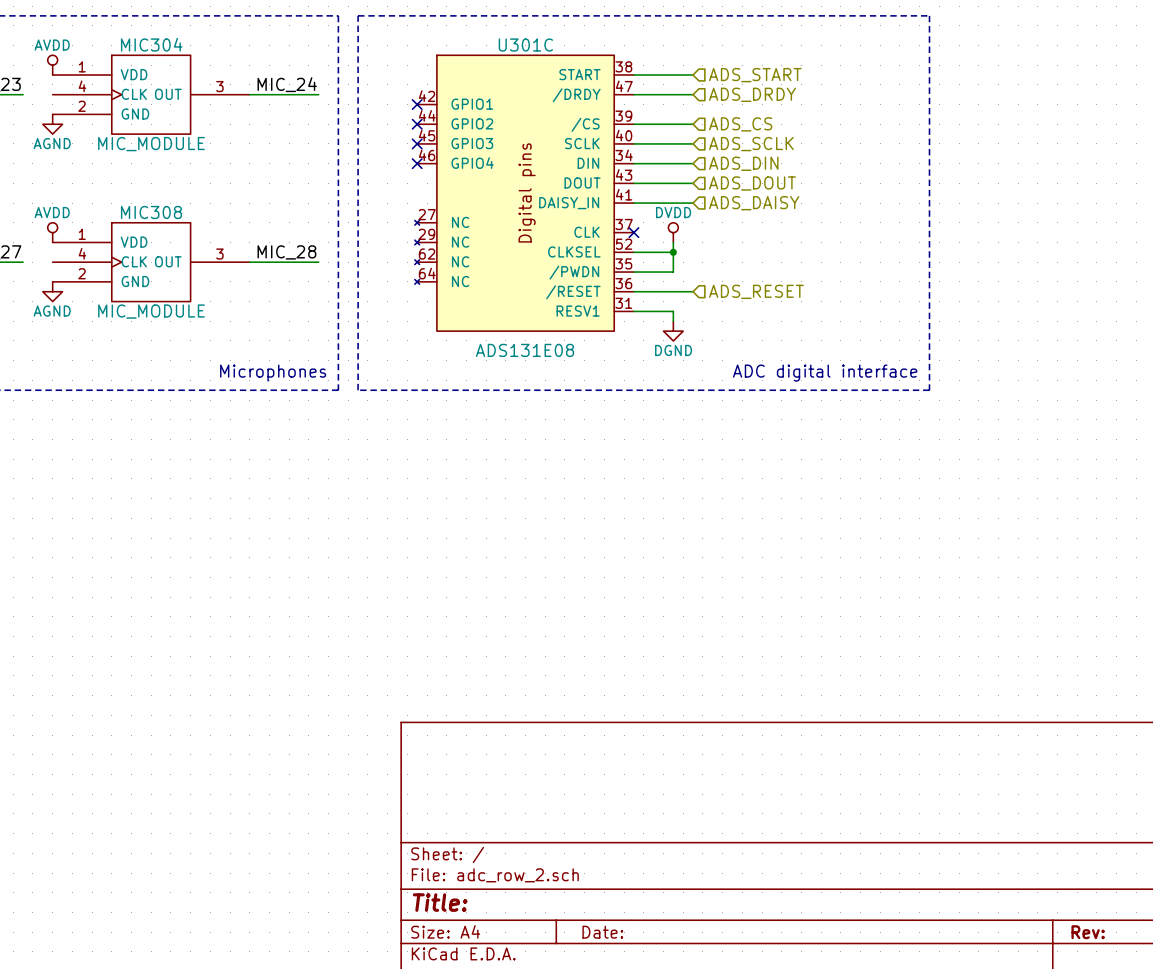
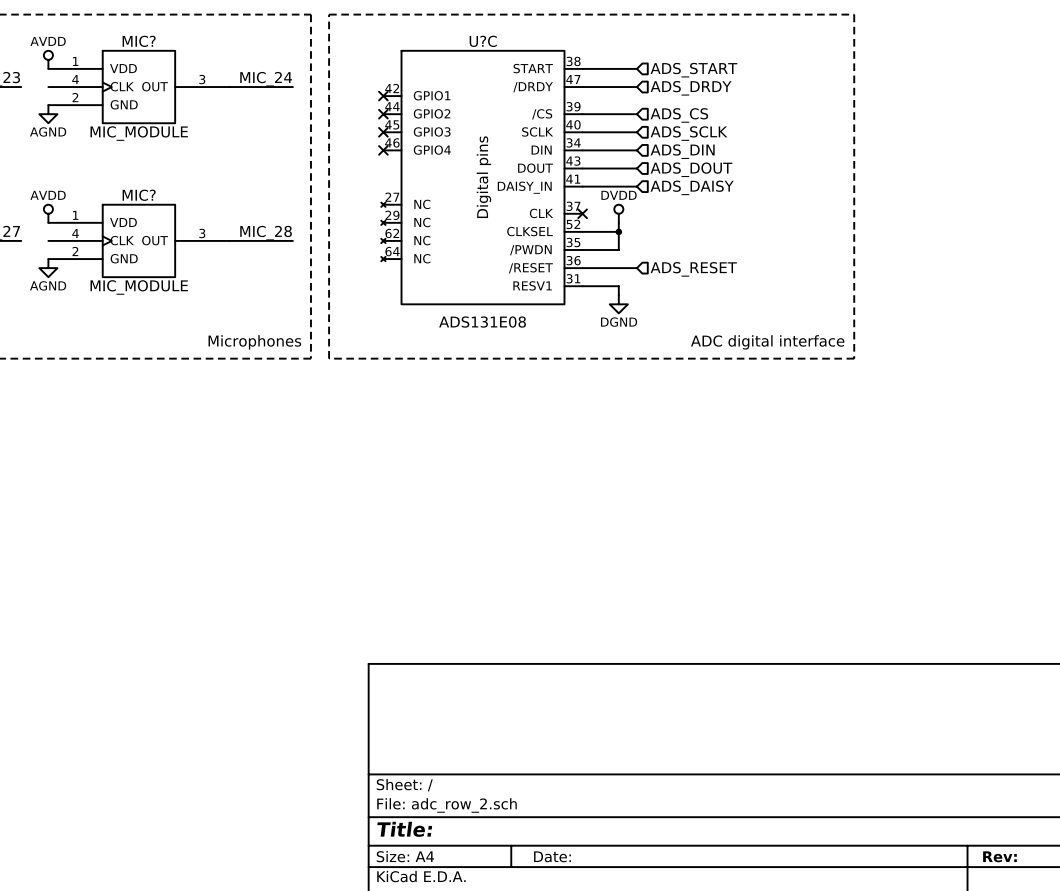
MIC304 name: MIC304 (151, 44) -> MIC? (139, 41)
U301C name: U301C (525, 44) -> U?C (483, 41)
MIC308 name: MIC308 (151, 212) -> MIC? (139, 195)

